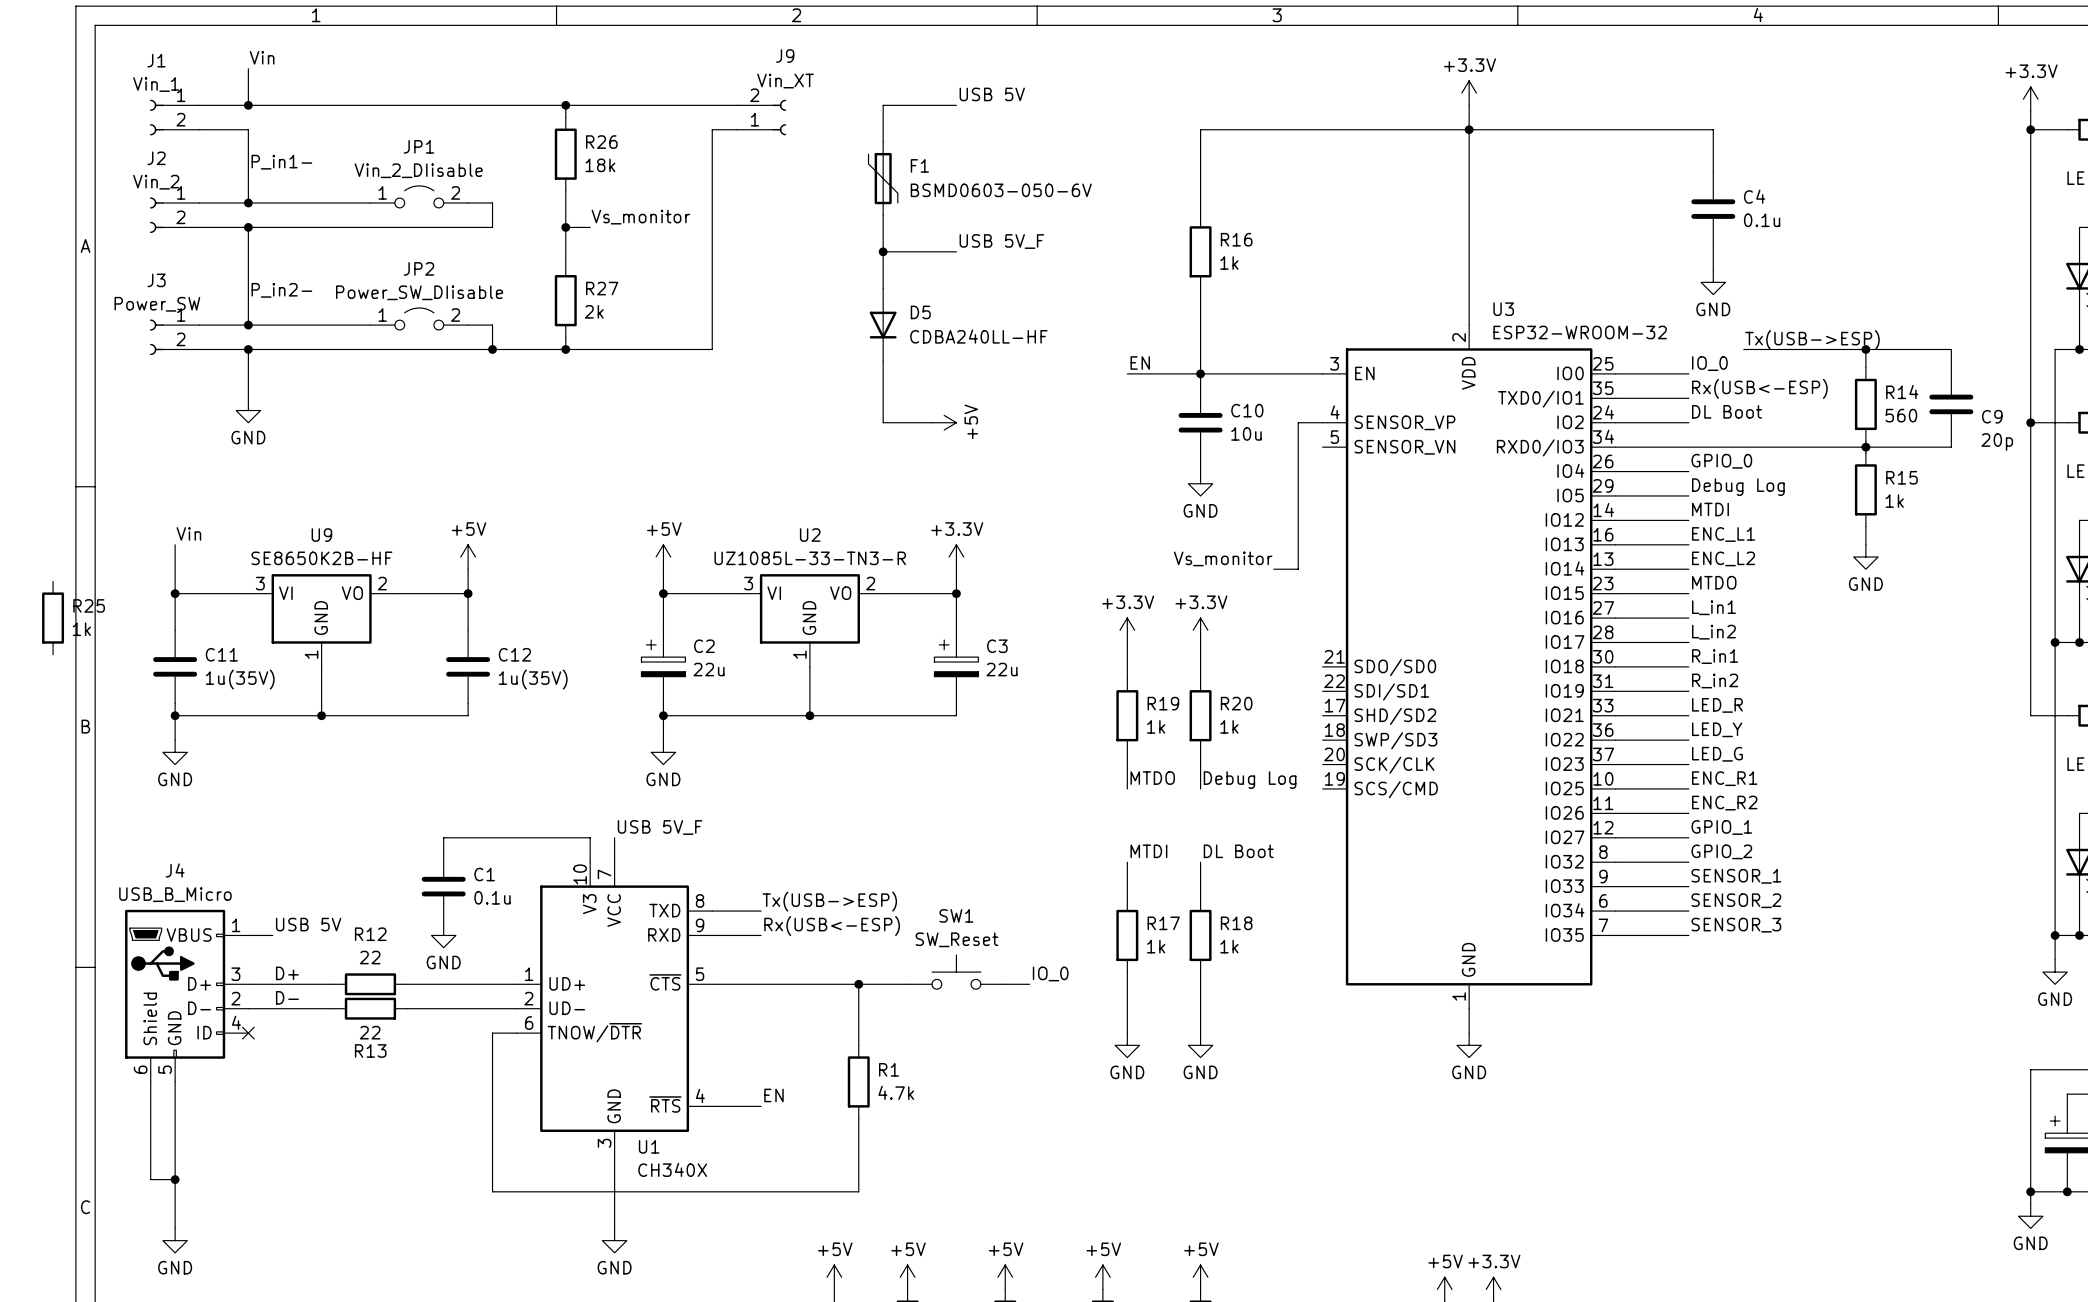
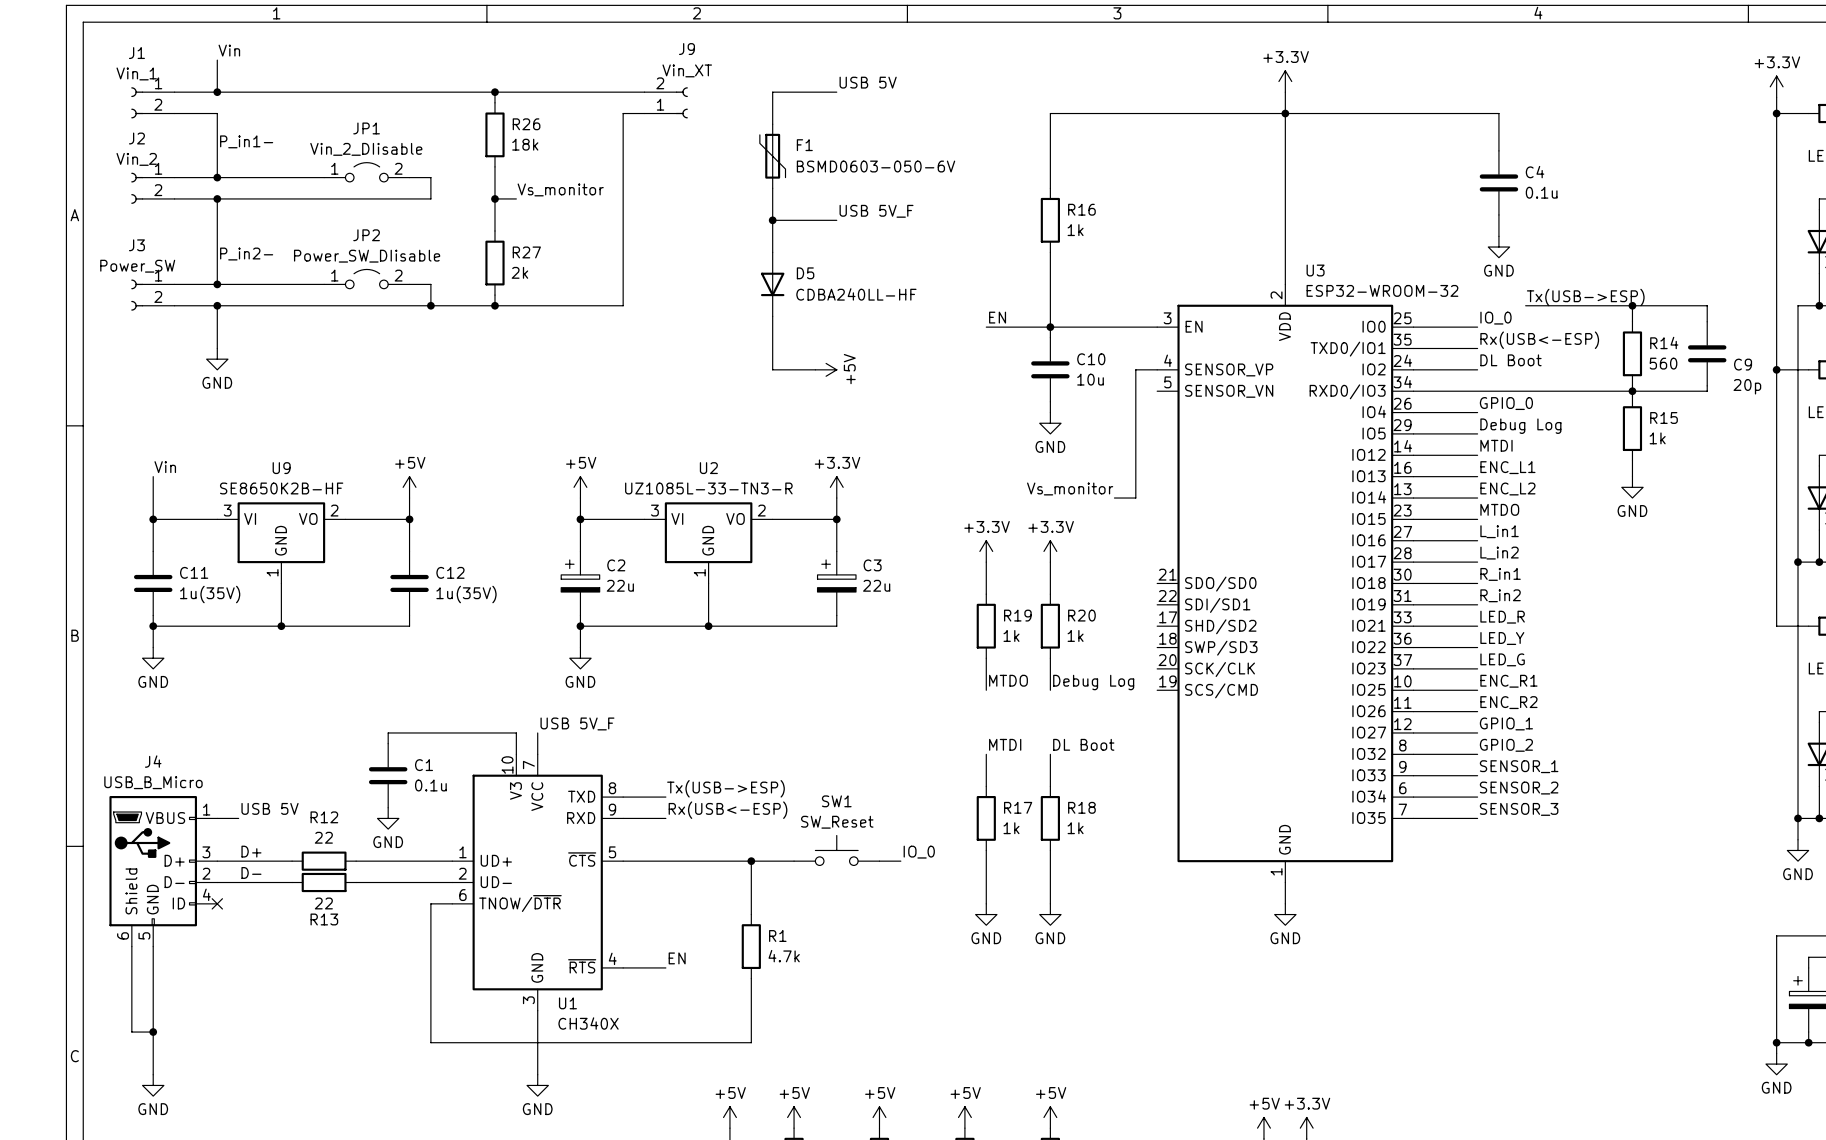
R25: 1k (53, 618) -> none

